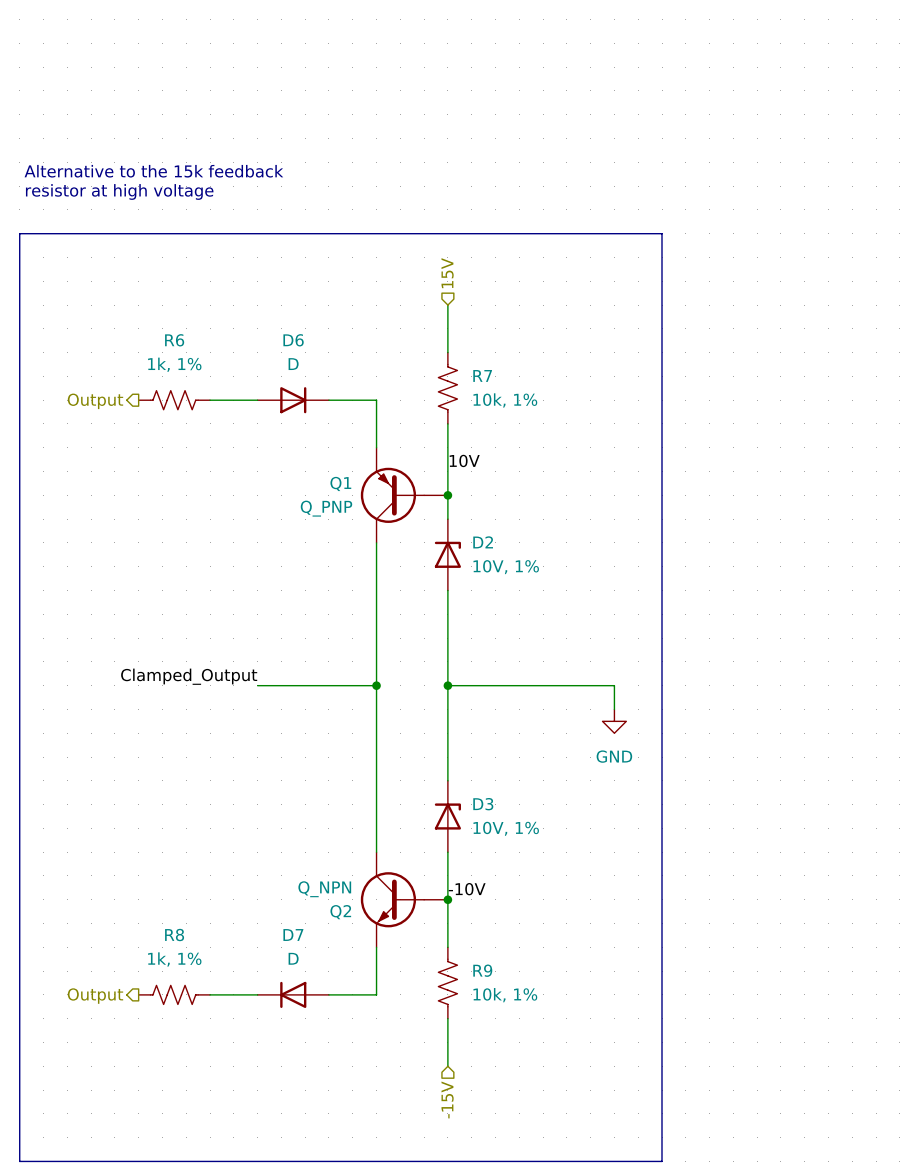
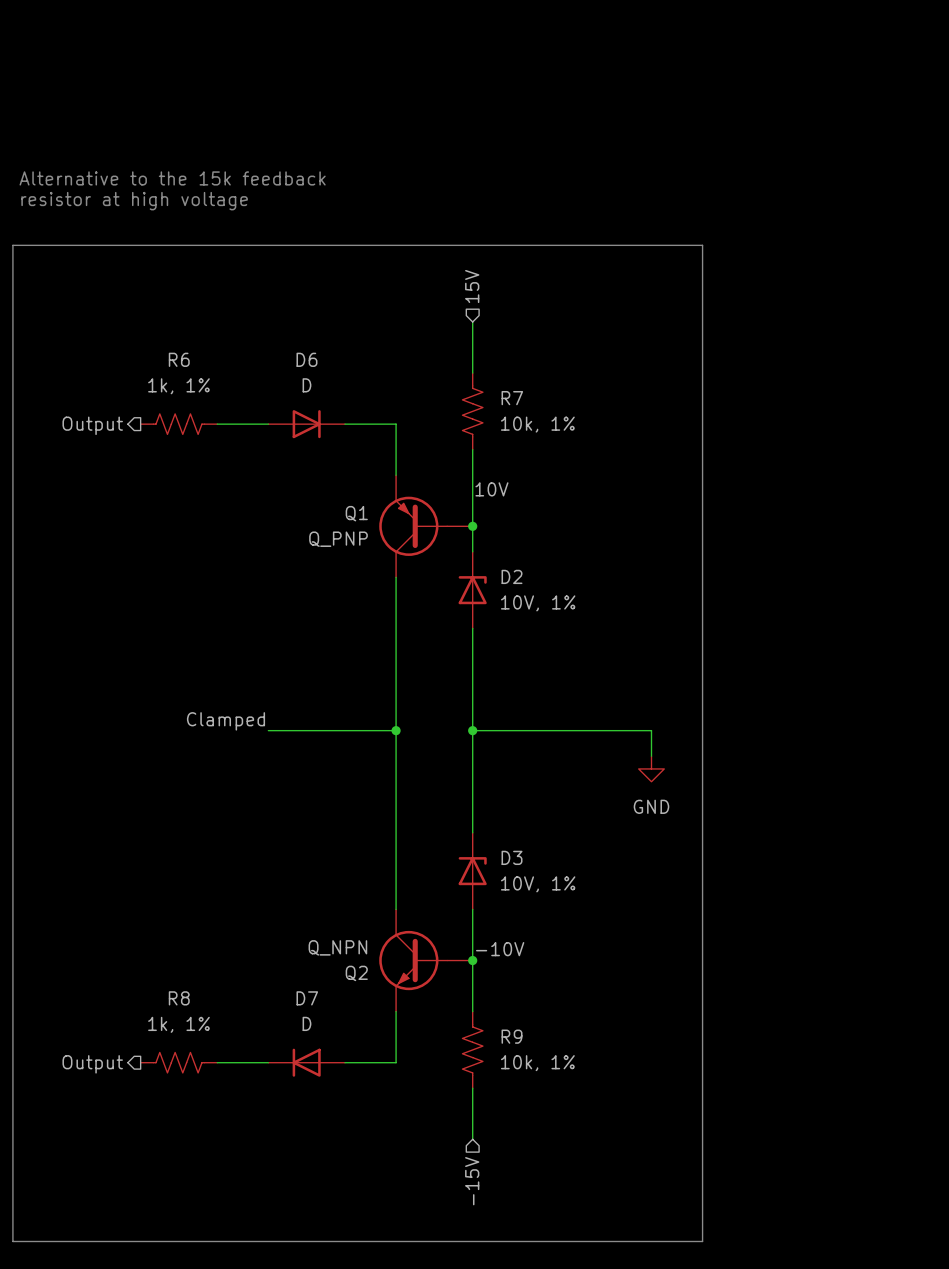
label: Clamped_Output (189, 676) -> Clamped (225, 721)

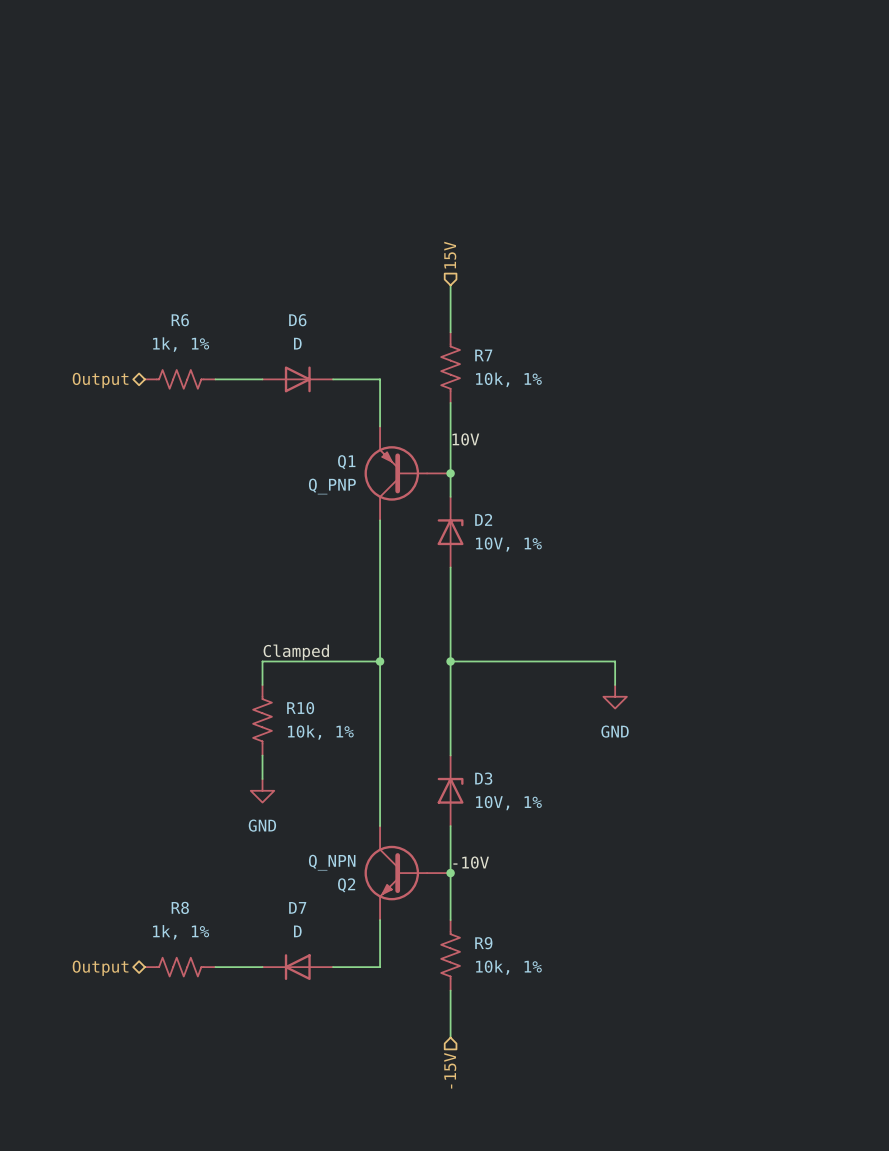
text: Alternative to the 15k feedback (172, 178) -> none
text: resistor at high voltage (134, 201) -> none
line: (12, 245) (702, 245) (702, 1241) (12, 1241) (12, 245) -> none
hierarchical label shape: output (92, 425) -> bidirectional (100, 380)
label position: Clamped (225, 721) -> Clamped (296, 652)
wire: none -> (262, 661) (262, 685)
R10: none -> 10k, 1% (262, 720)
wire: none -> (262, 755) (262, 779)
power symbol: none -> GND (262, 790)
hierarchical label shape: output (92, 1064) -> bidirectional (100, 968)

